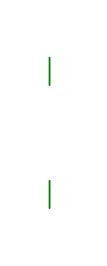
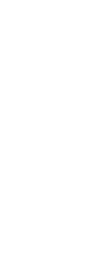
wire: (49, 57) (49, 85) -> none
wire: (49, 180) (49, 208) -> none

